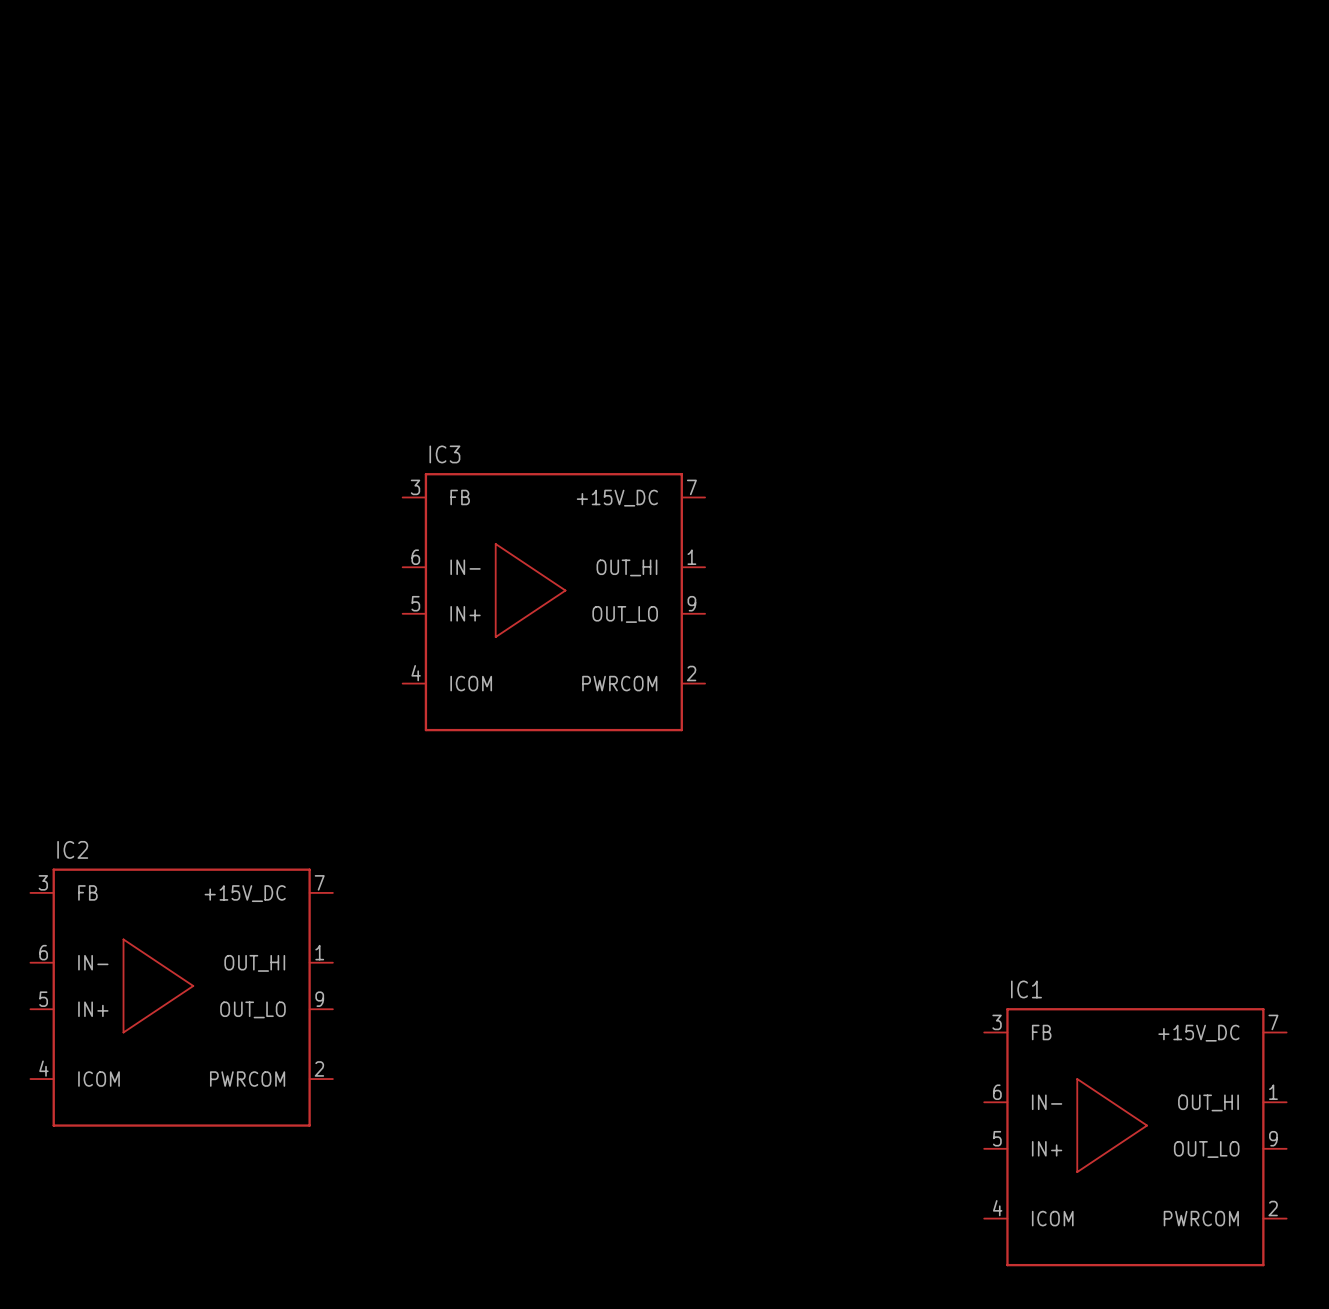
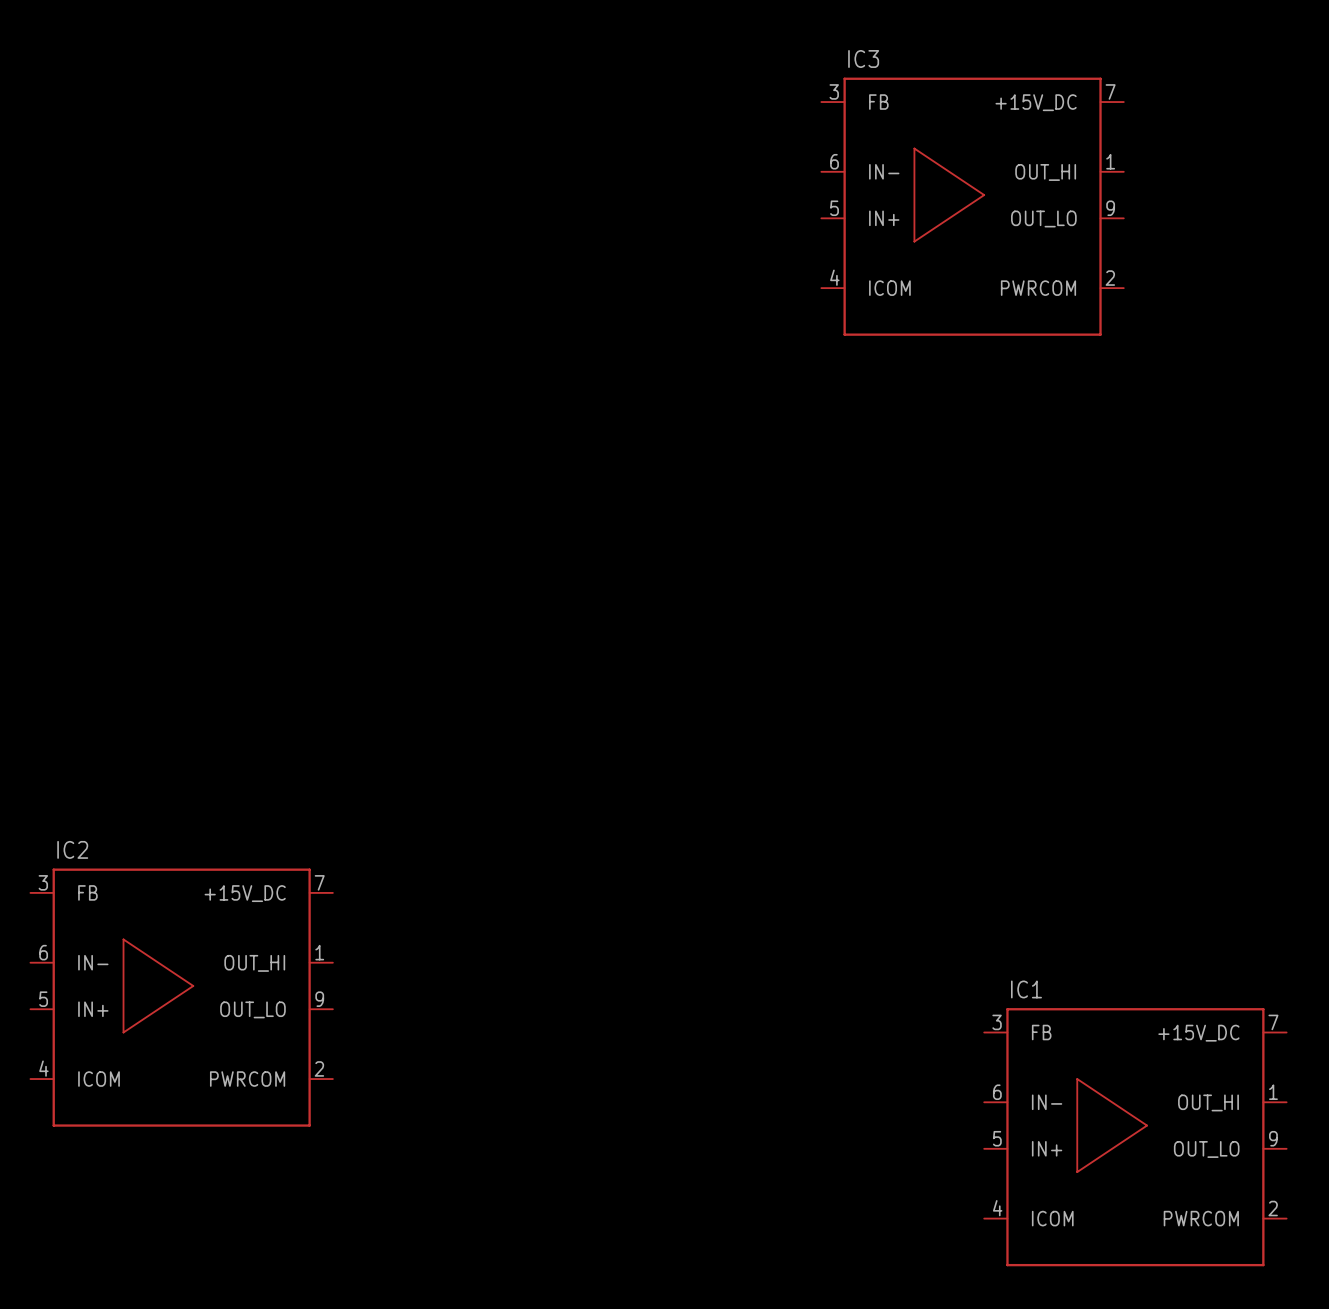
IC3 position: (553, 602) -> (972, 206)

